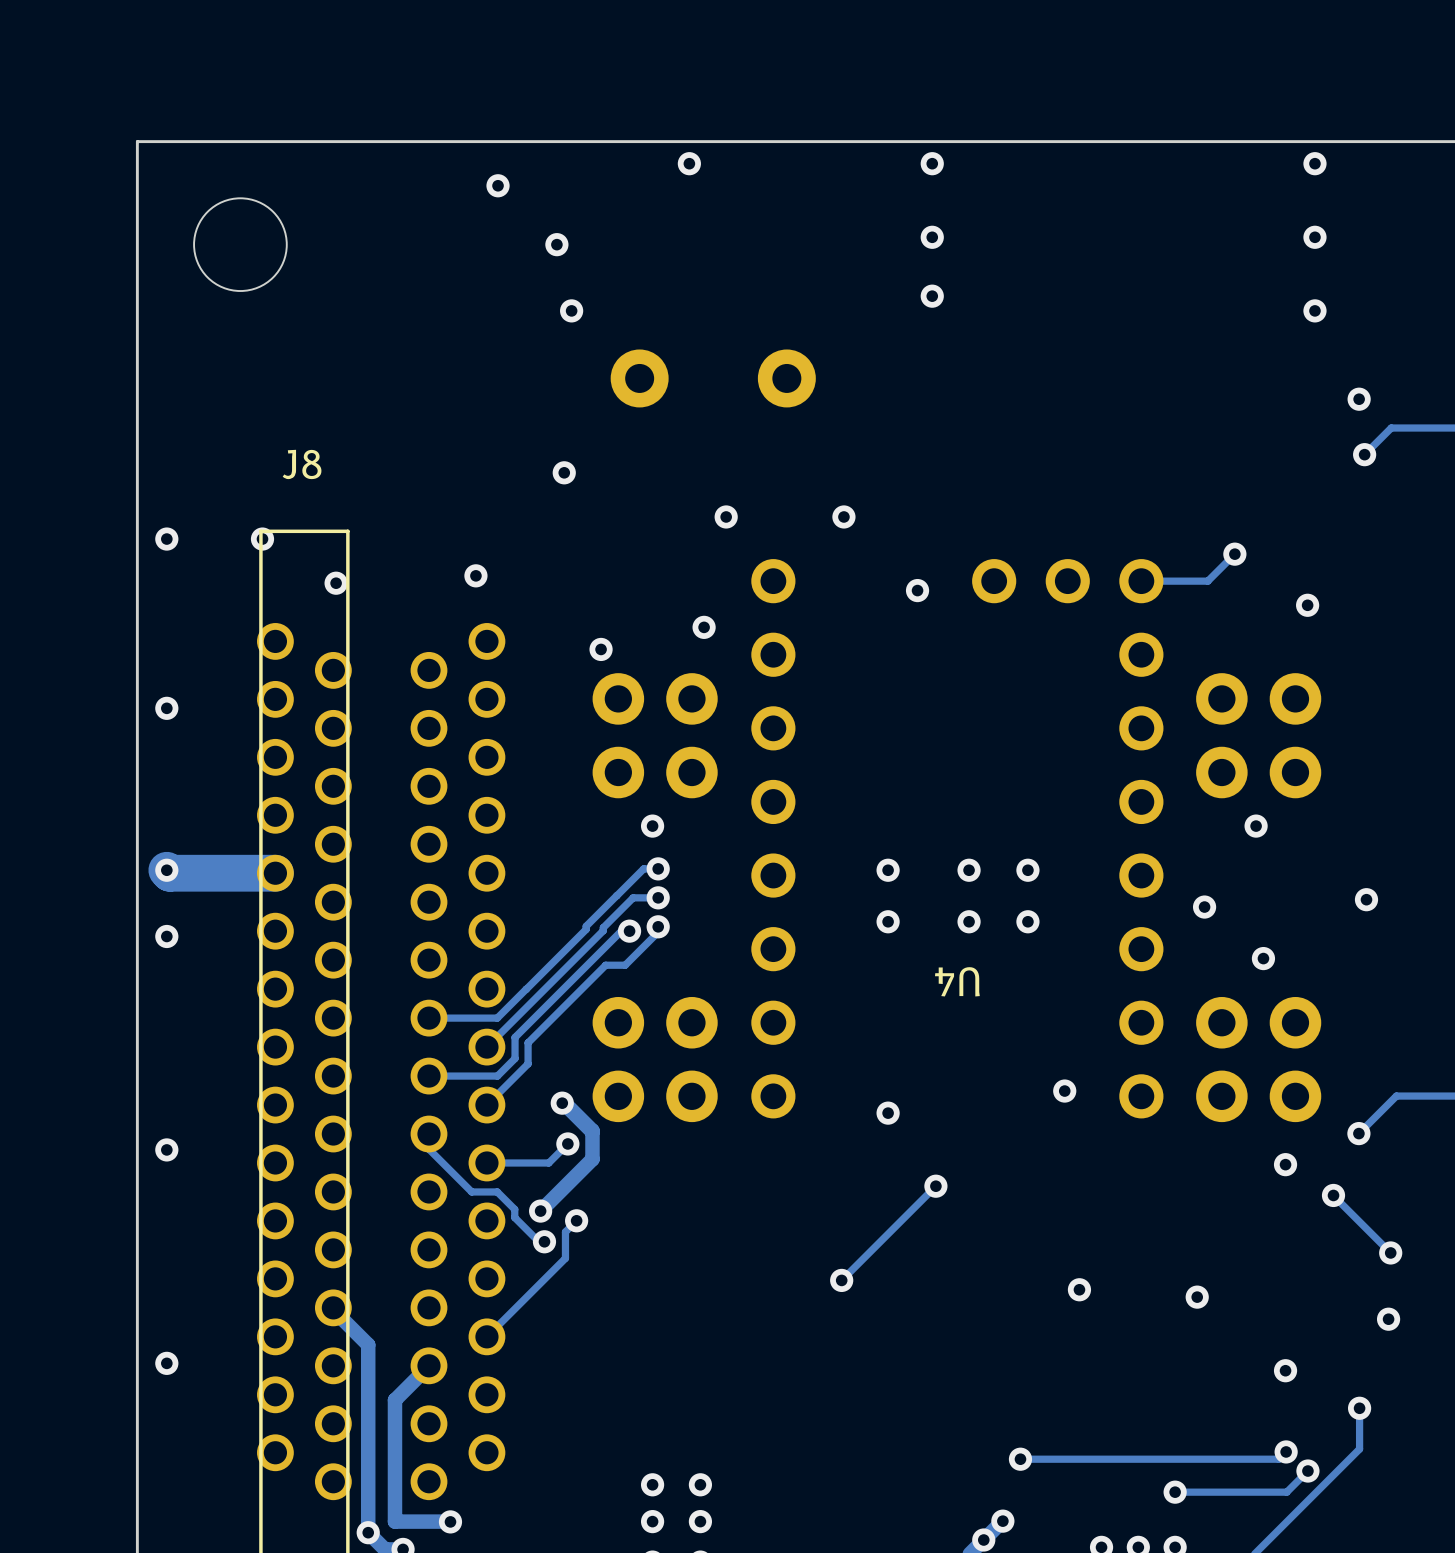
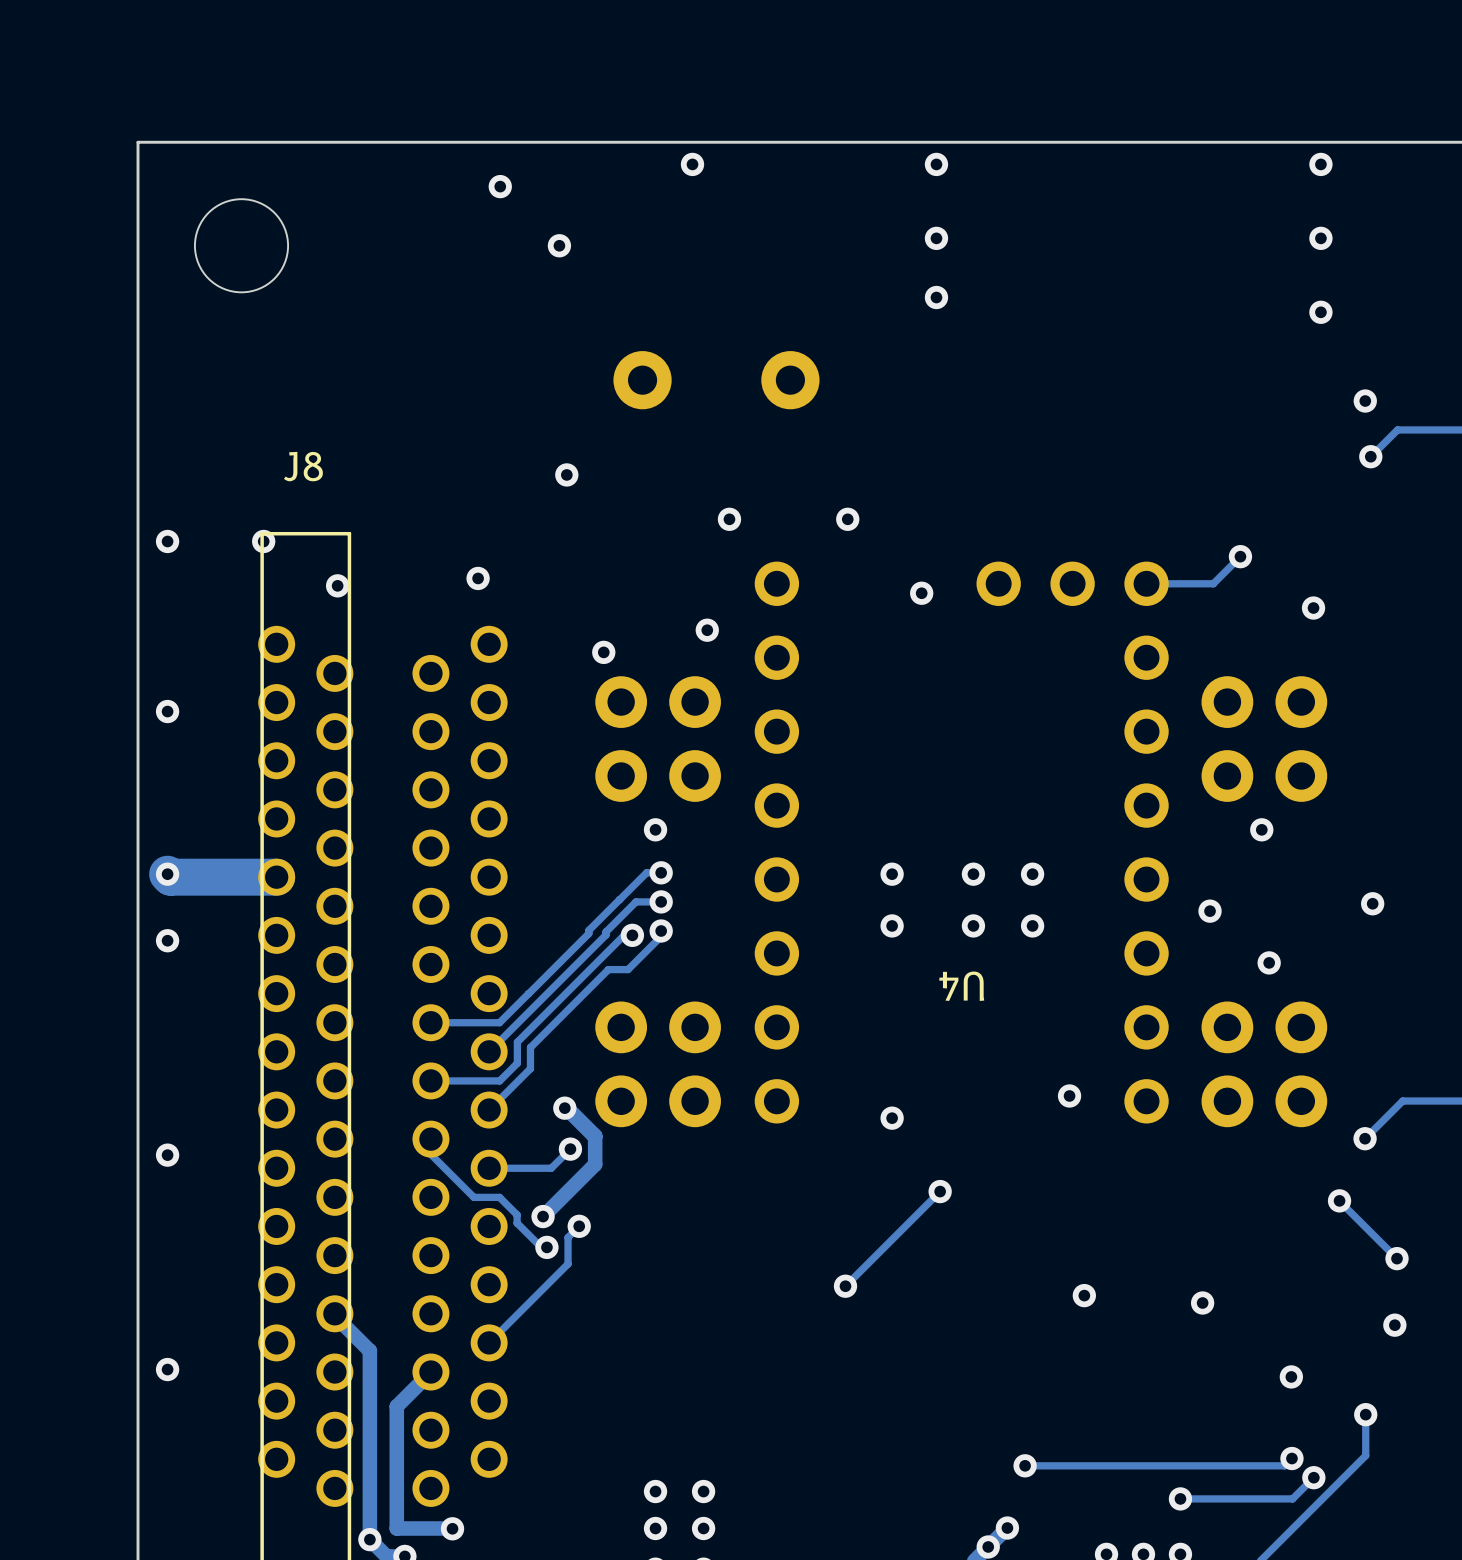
via: (571, 310) -> none
via: (1285, 1164) -> none

